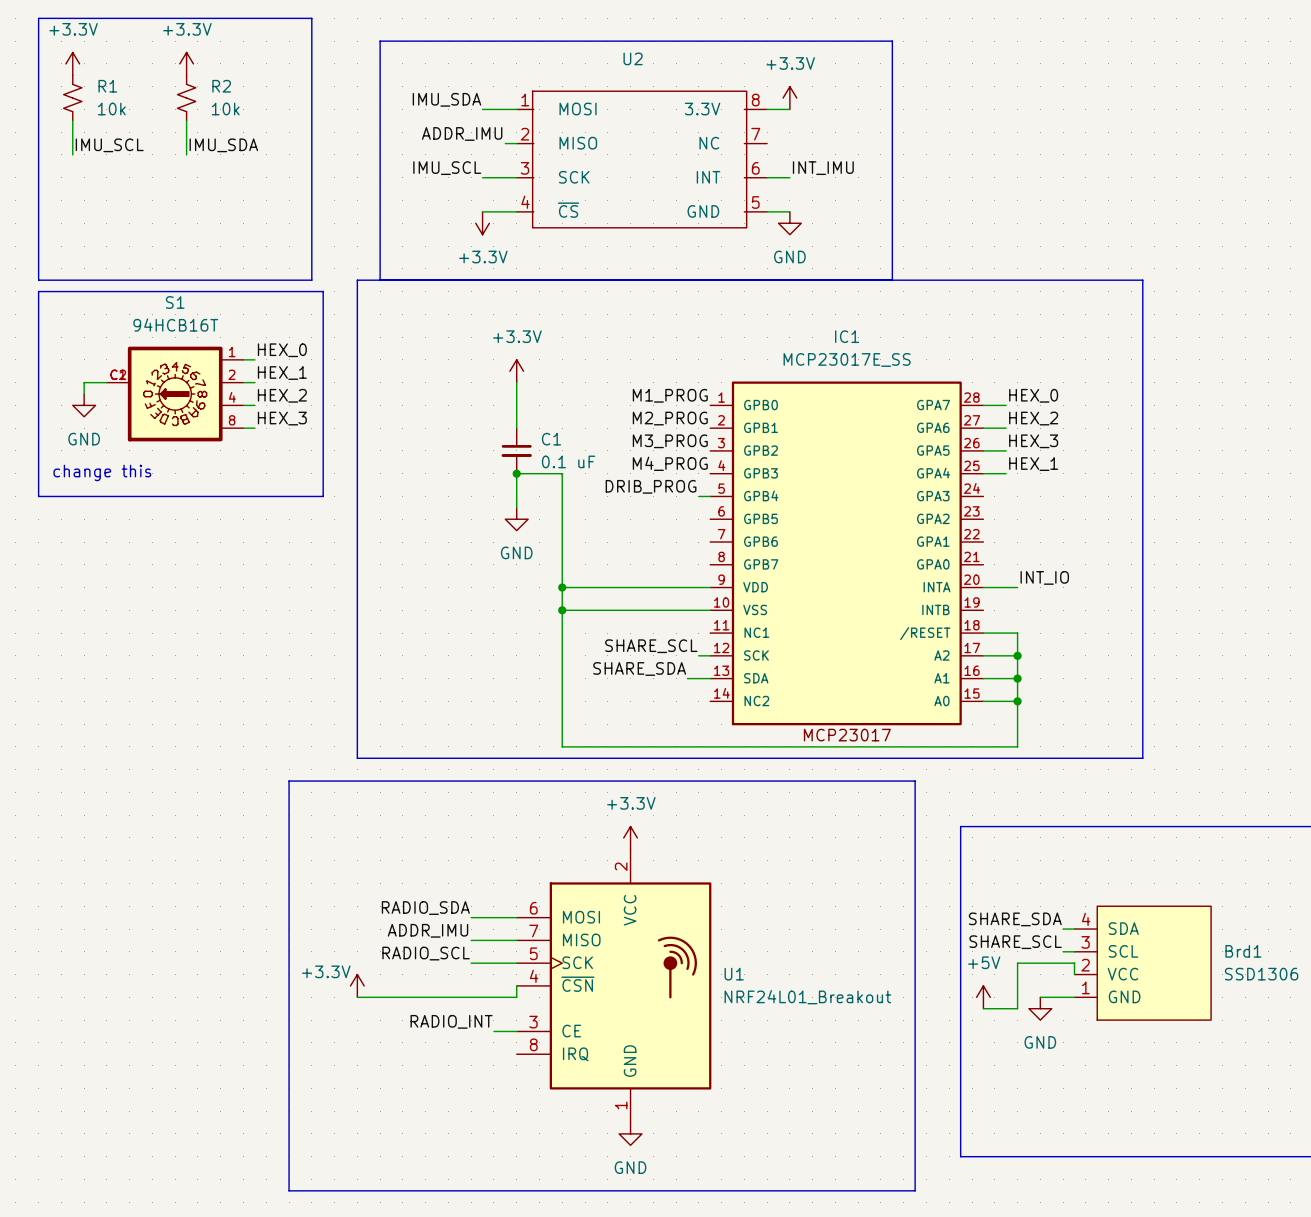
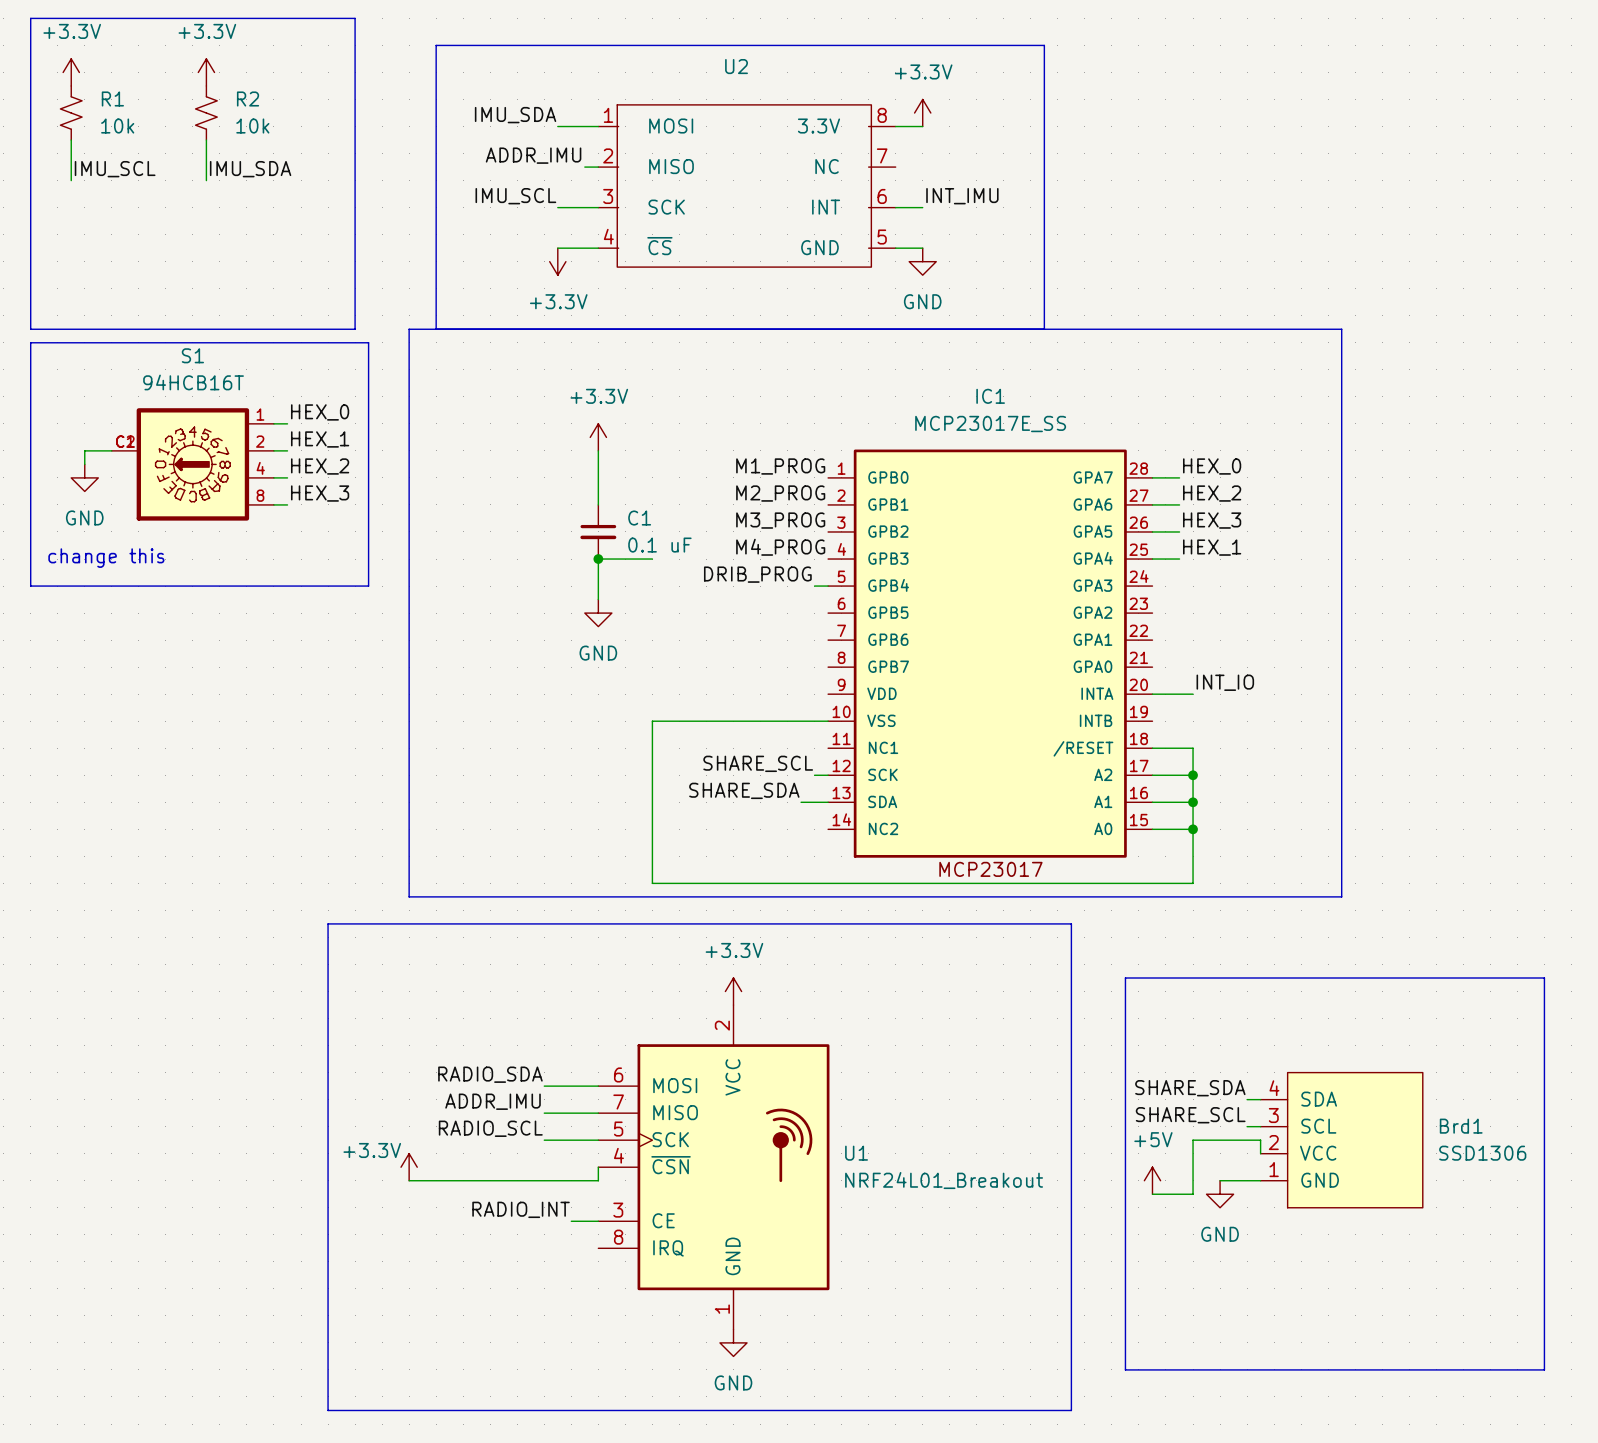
wire: (562, 473) (562, 610) -> none
wire: (562, 587) (710, 587) -> none
junction: (562, 587) -> none
junction: (562, 610) -> none

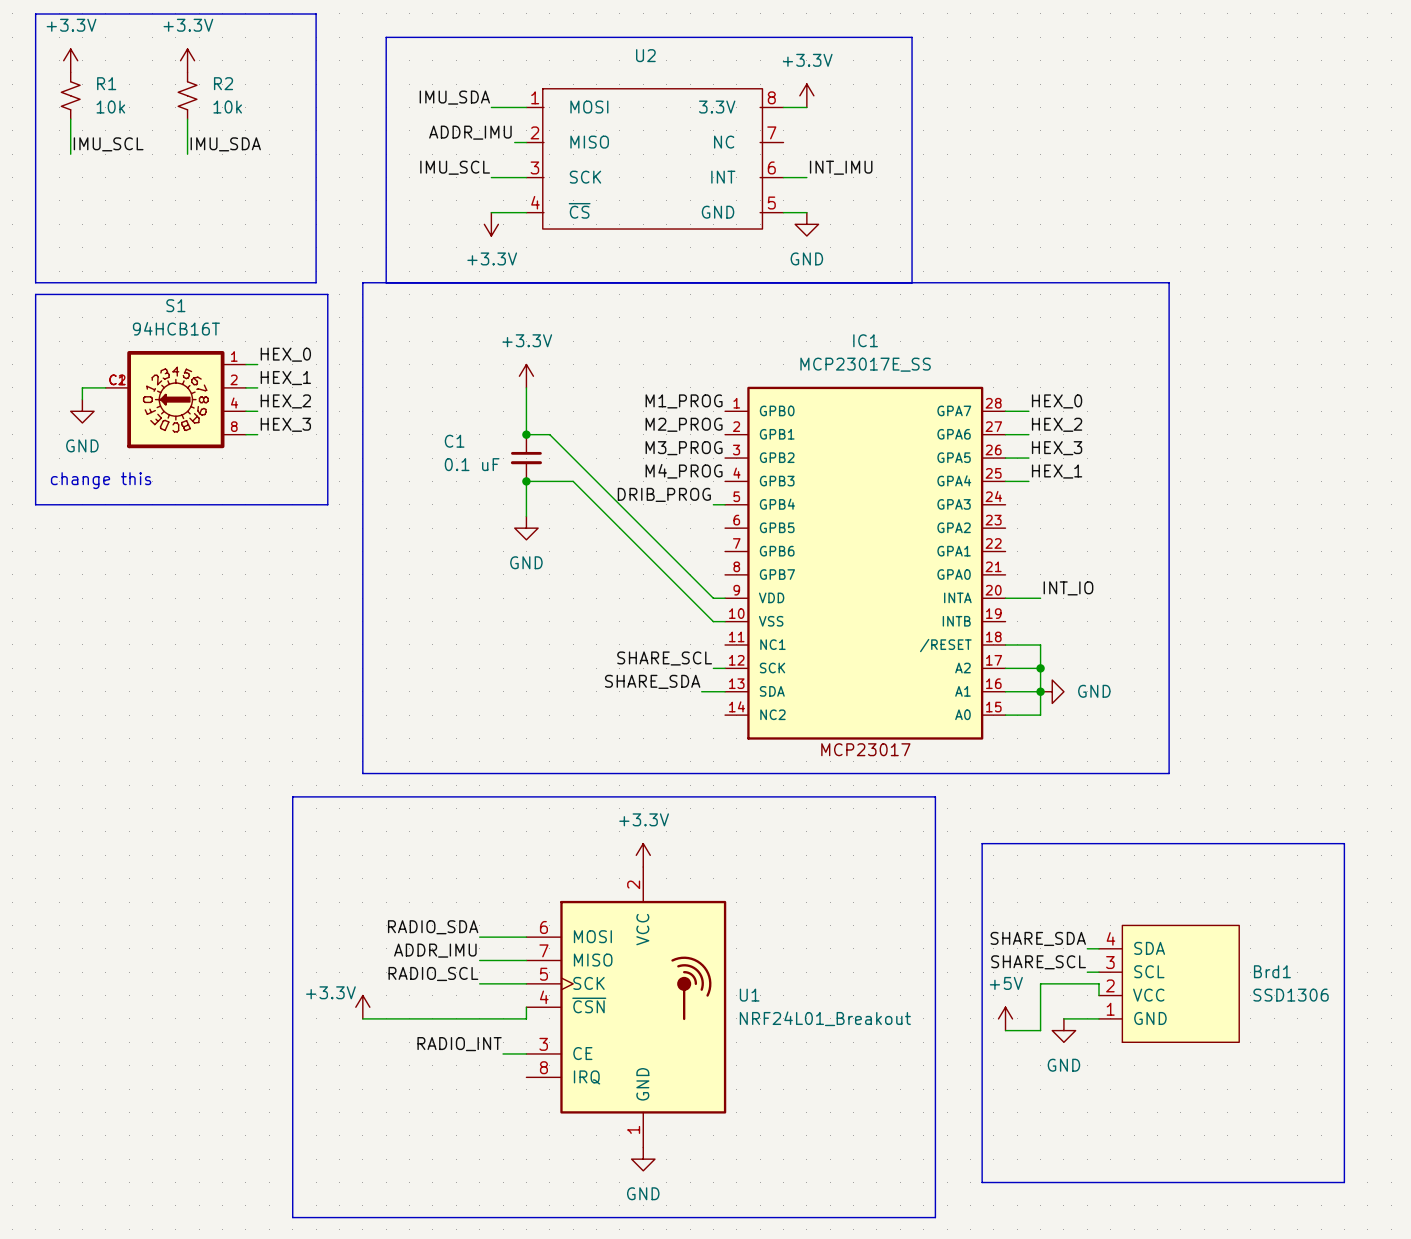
wire: none -> (526, 434) (549, 434) (713, 598) (725, 598)
junction: none -> (526, 434)
C1 name position: C1 (639, 518) -> C1 (454, 441)
C1 value position: 0.1 uF (659, 545) -> 0.1 uF (472, 464)
wire: (814, 721) (652, 721) (652, 883) (1193, 883) (1193, 829) -> (713, 621) (573, 481)
power symbol: none -> GND (1052, 691)
junction: (1193, 829) -> none

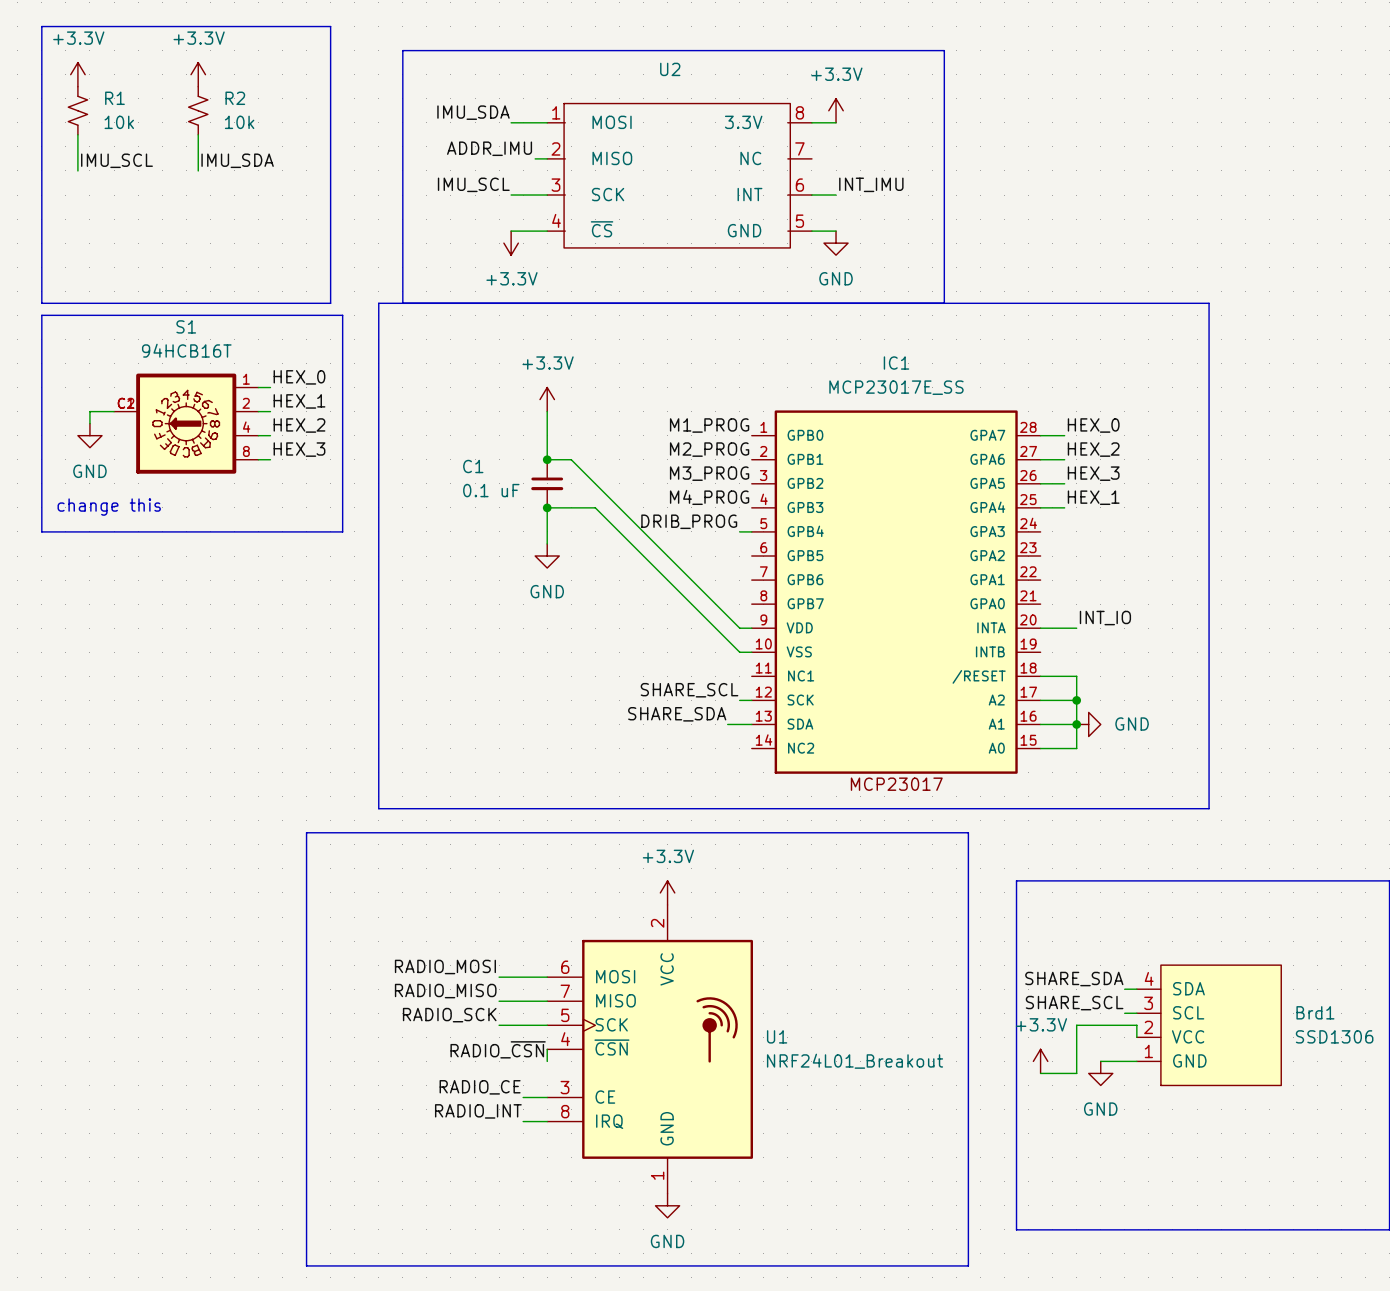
label: RADIO_SDA (433, 927) -> RADIO_MOSI (445, 967)
label: ADDR_IMU (435, 950) -> RADIO_MISO (445, 991)
label: RADIO_SCL (433, 973) -> RADIO_SCK (449, 1015)
power symbol: +3.3V (362, 1007) -> none
label: none -> RADIO_~{CSN} (498, 1049)
wire: (362, 1018) (526, 1018) -> none
power symbol: +5V (1005, 1018) -> +3.3V (1040, 1061)
label: RADIO_INT (459, 1044) -> RADIO_CE (480, 1087)
label: none -> RADIO_INT (478, 1111)
wire: none -> (523, 1121) (547, 1121)

